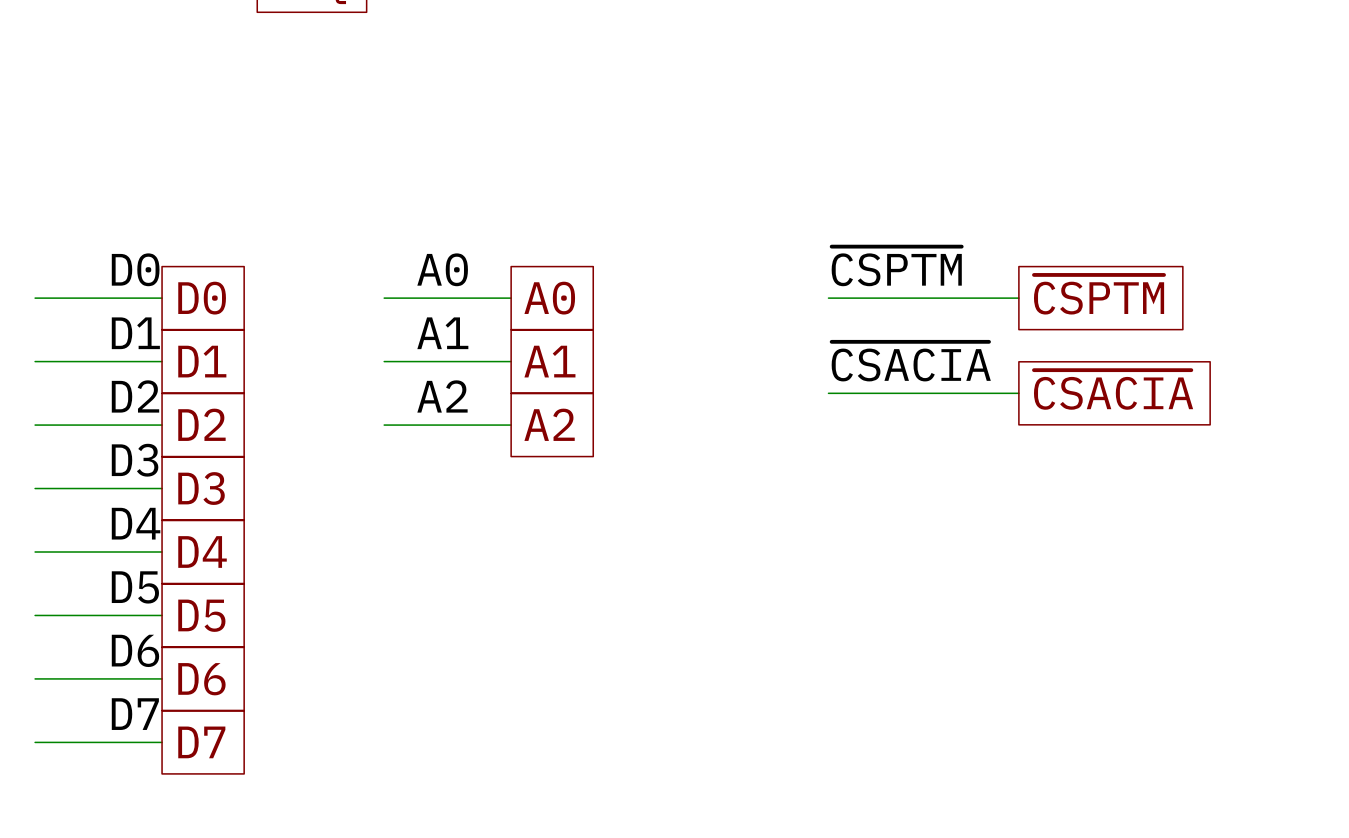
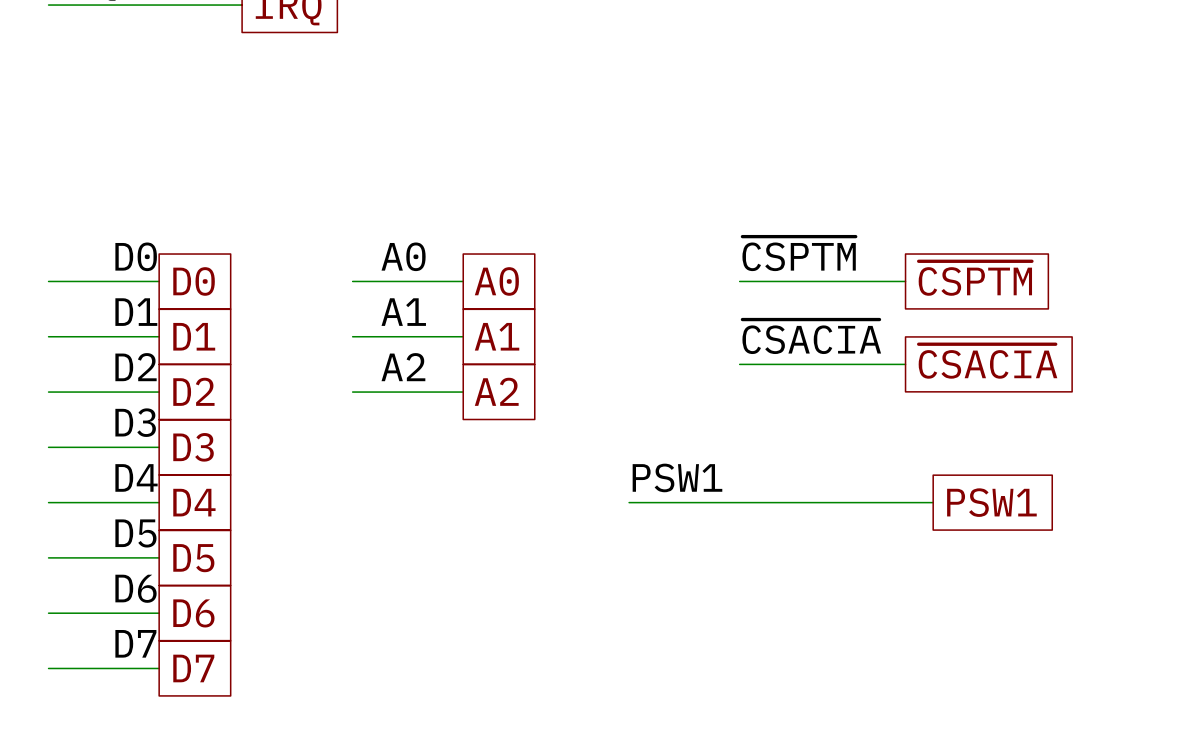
label: none -> PSW1 (677, 477)
wire: none -> (629, 502) (933, 502)
global label: none -> PSW1 (991, 502)

